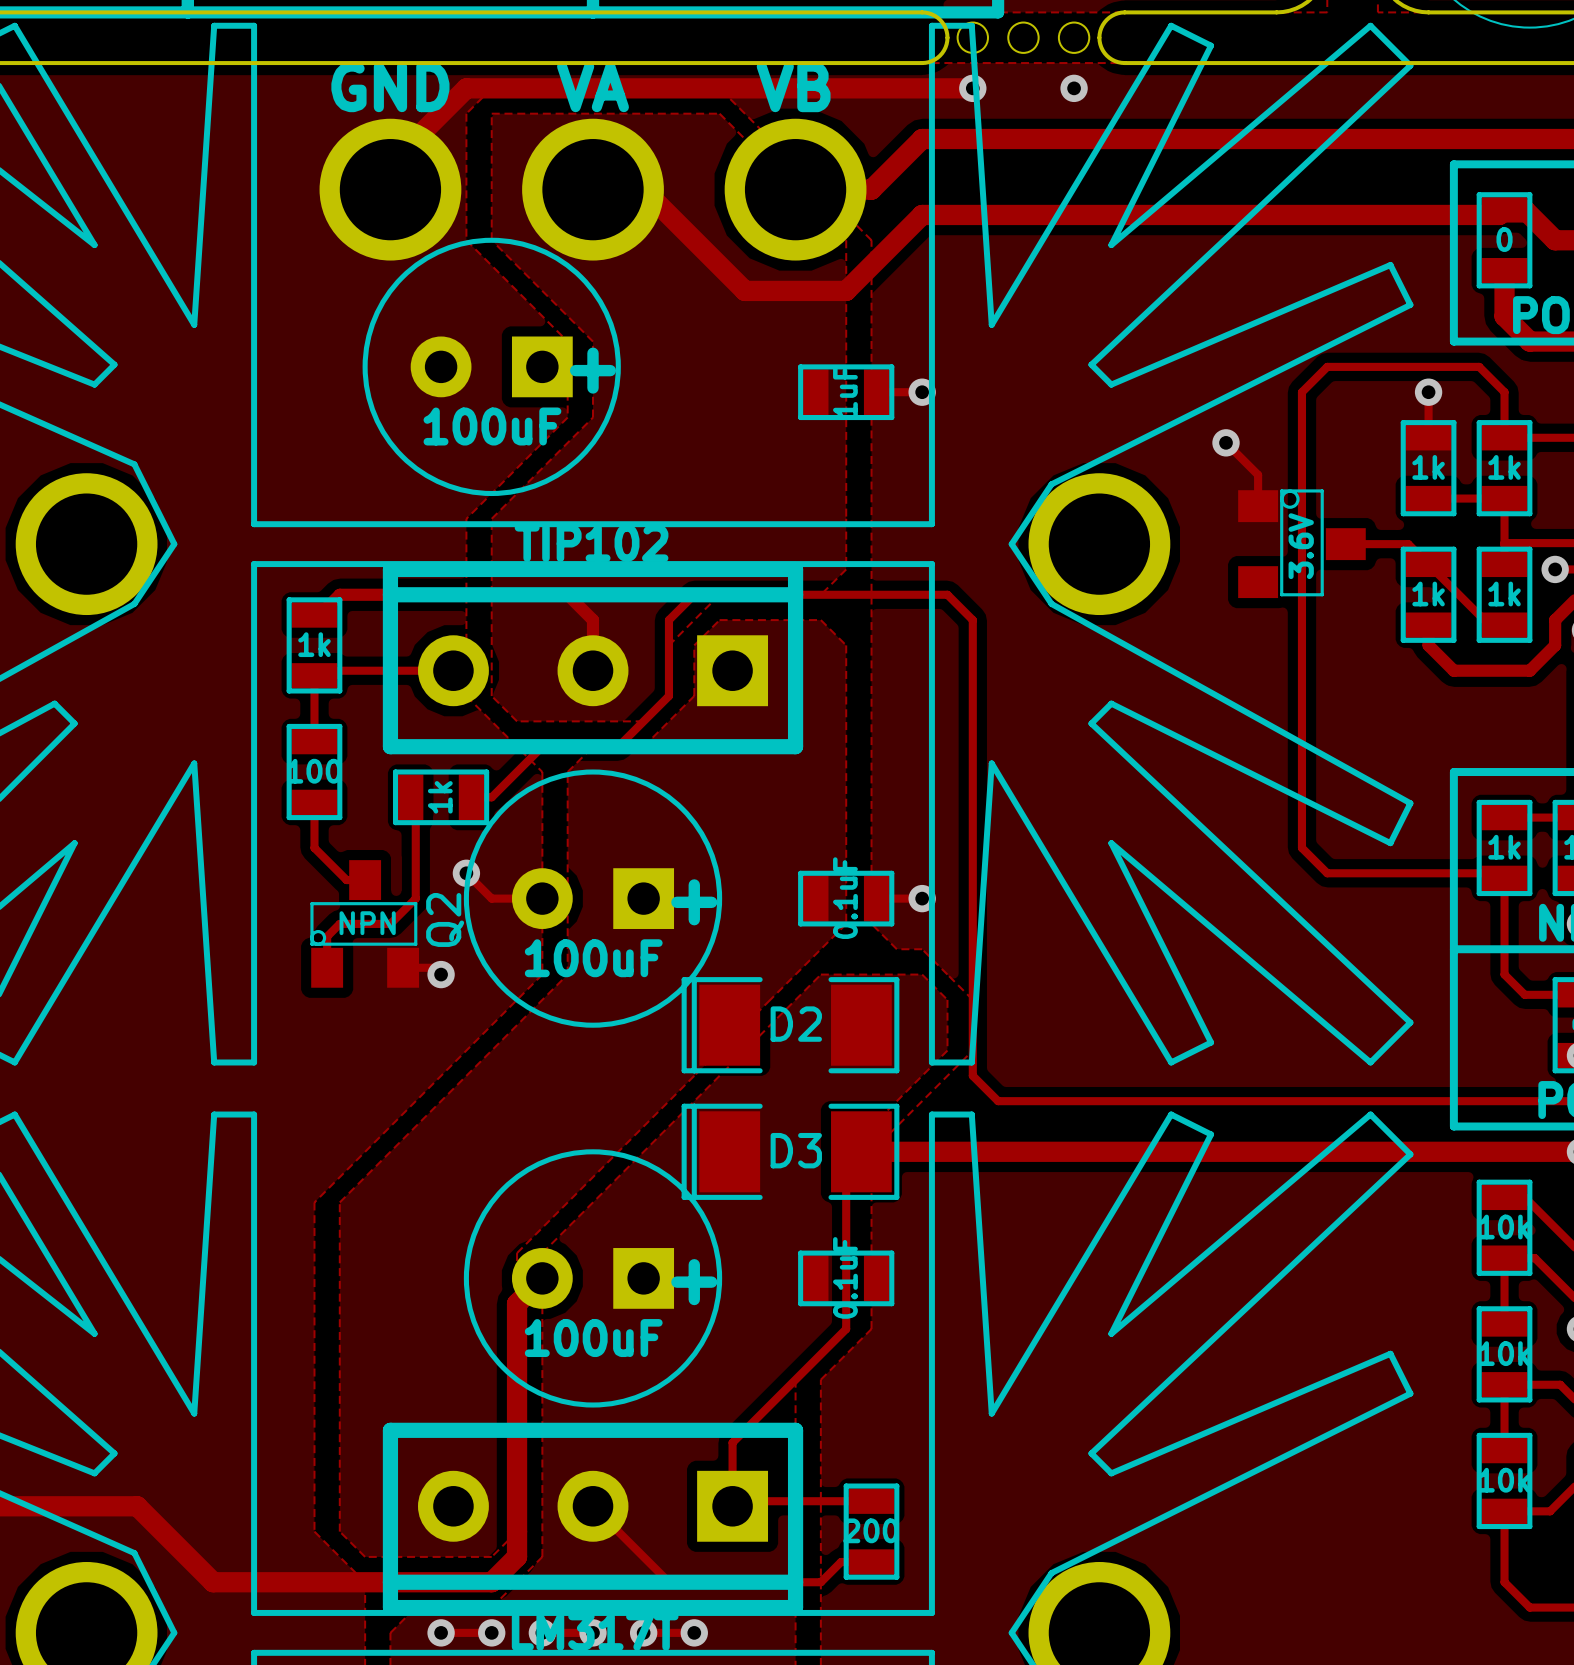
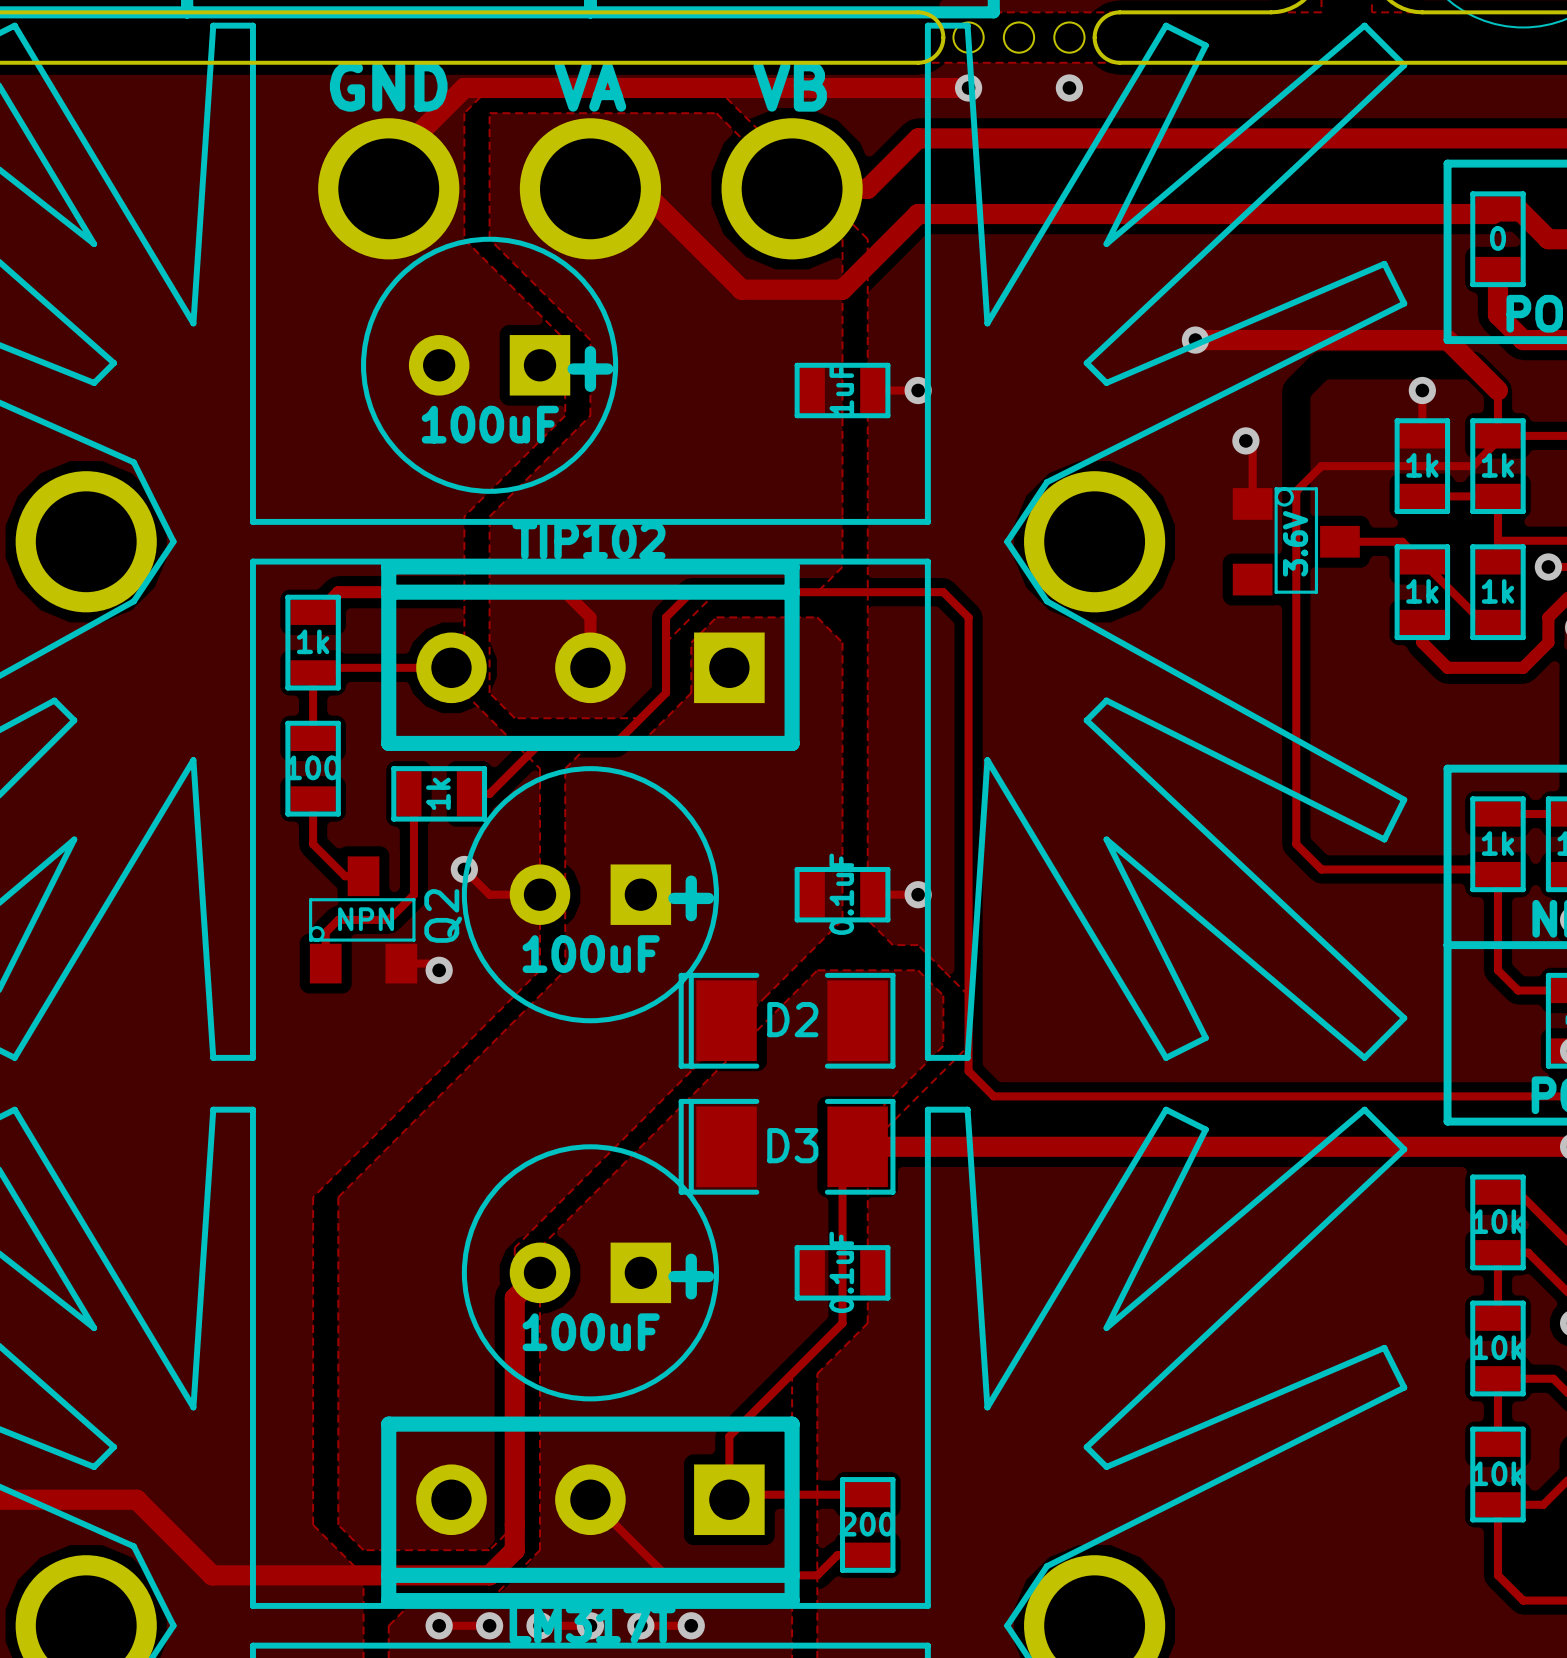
track: none -> (1195, 340) (1447, 340) (1472, 365)
via: none -> (1195, 340)
track: (1479, 366) (1327, 366) (1301, 392) (1301, 493) -> (1497, 435) (1497, 440) (1472, 466) (1321, 466) (1296, 491)
track width: thin (1479, 366) (1504, 392) -> thick (1472, 365) (1497, 390)
track: (1226, 442) (1258, 474) -> (1245, 440) (1252, 447) (1252, 472)
via position: (1226, 442) -> (1245, 440)

